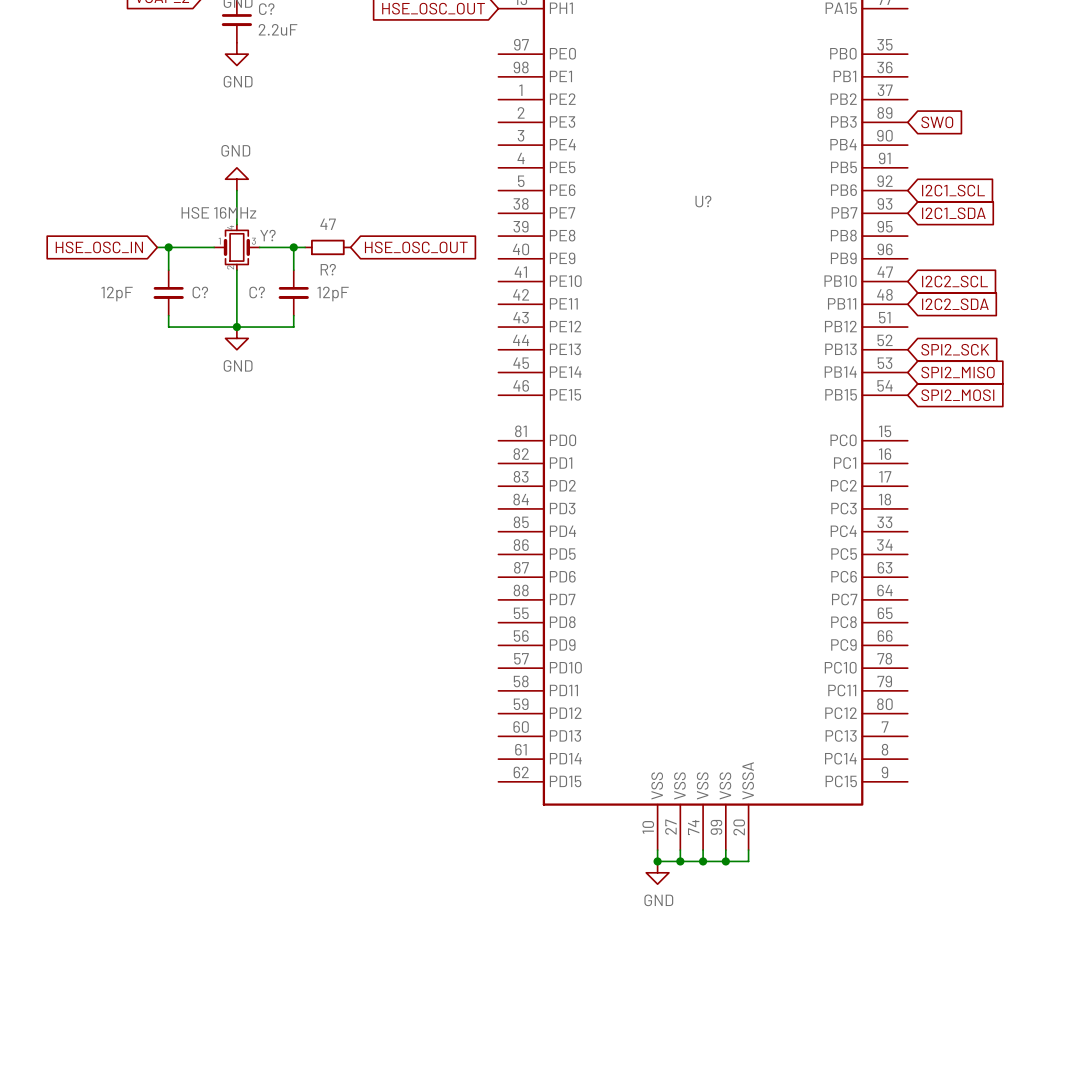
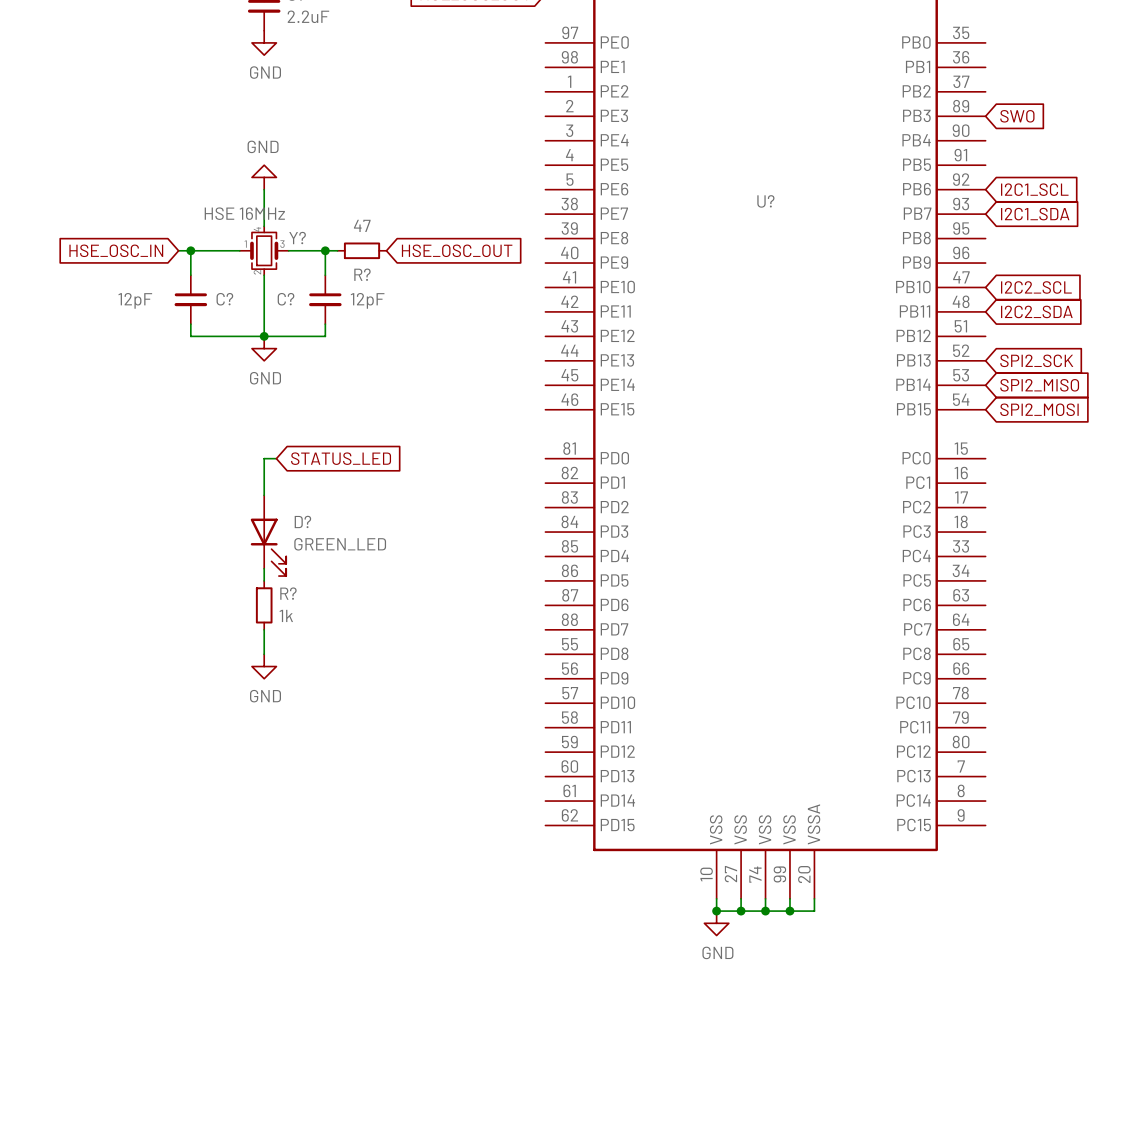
wire: none -> (276, 458) (264, 458) (264, 495)
global label: none -> STATUS_LED (341, 458)
D?: none -> GREEN_LED (268, 535)
wire: none -> (264, 568) (264, 580)
R?: none -> 1k (264, 605)
wire: none -> (264, 629) (264, 654)
power symbol: none -> GND (264, 666)

